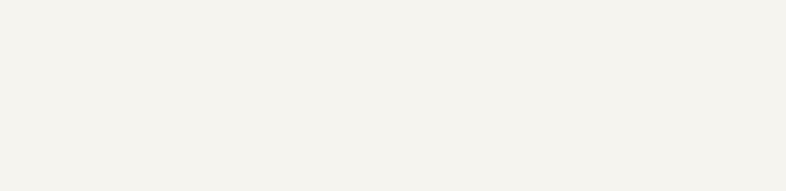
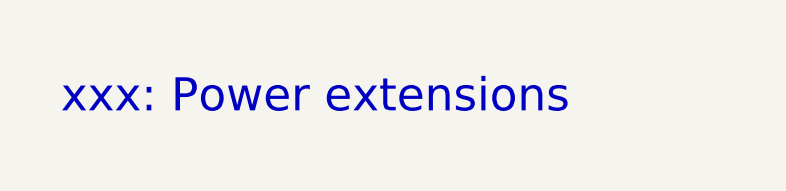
text: none -> xxx: Power extensions (314, 93)

